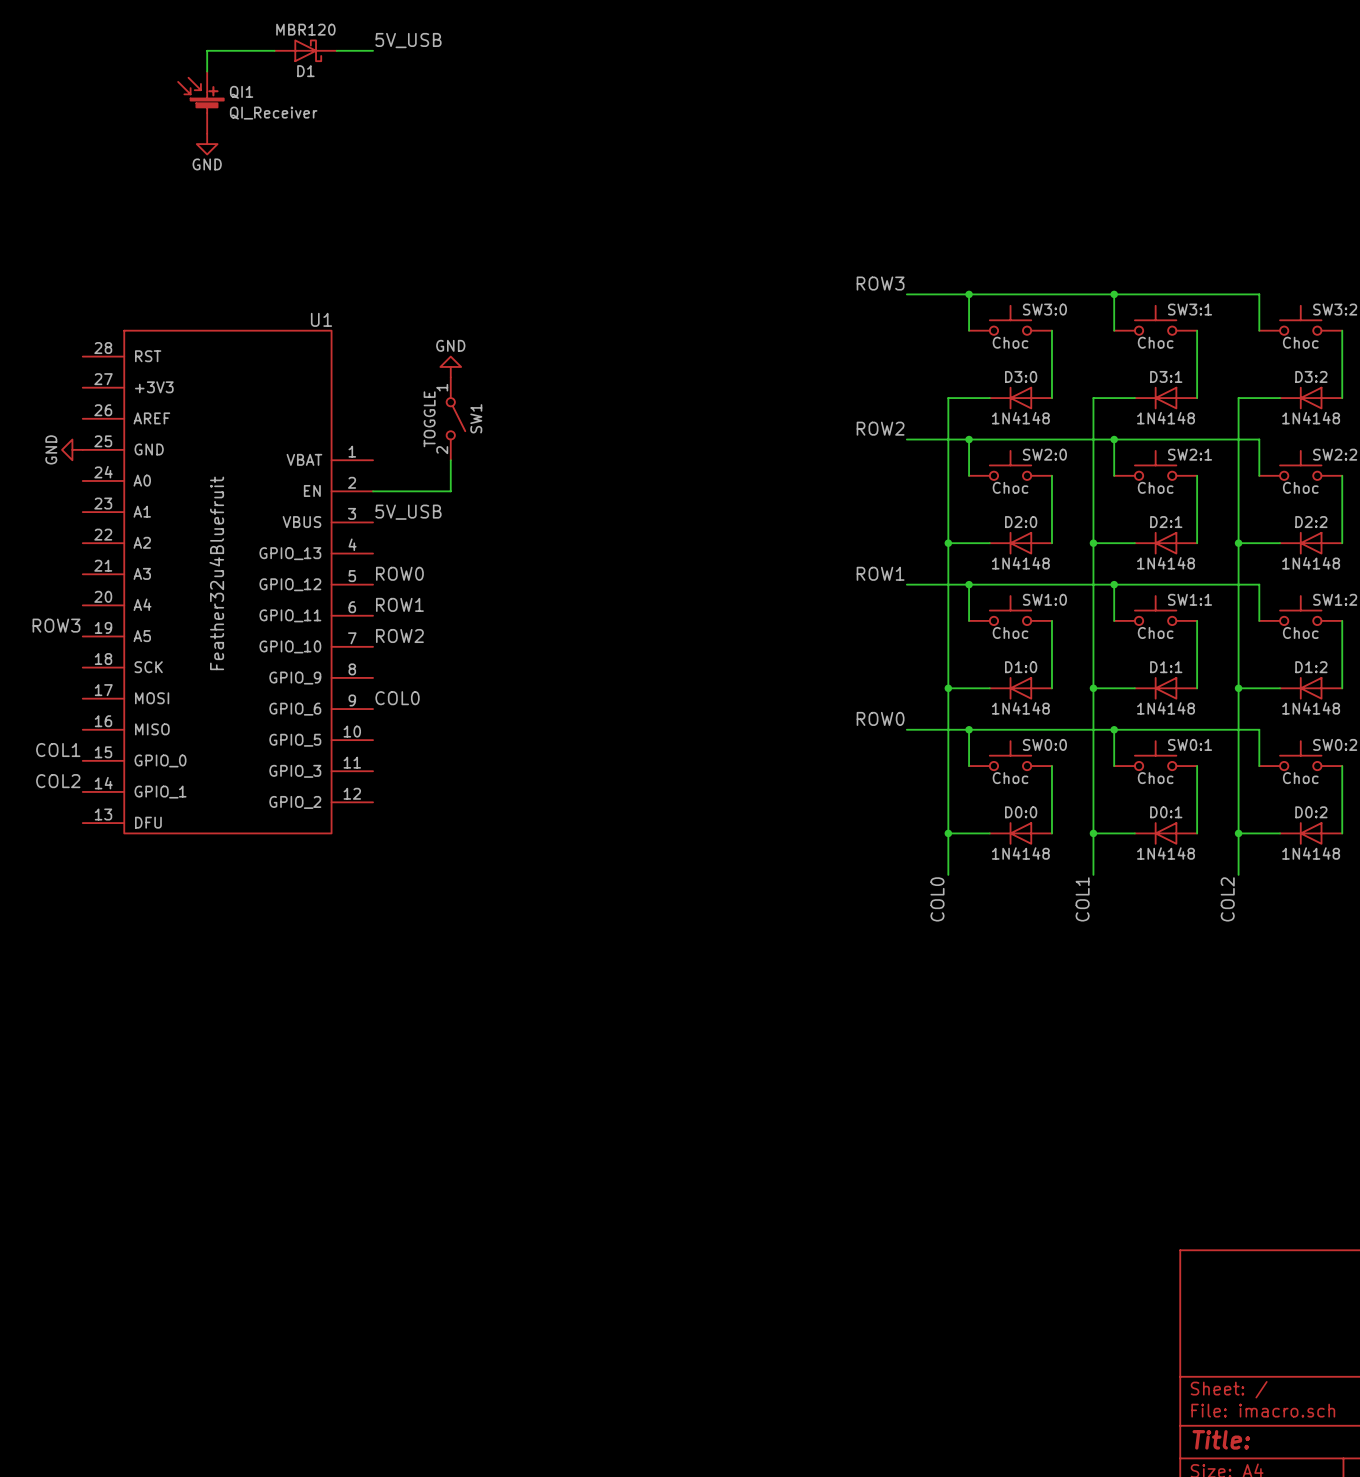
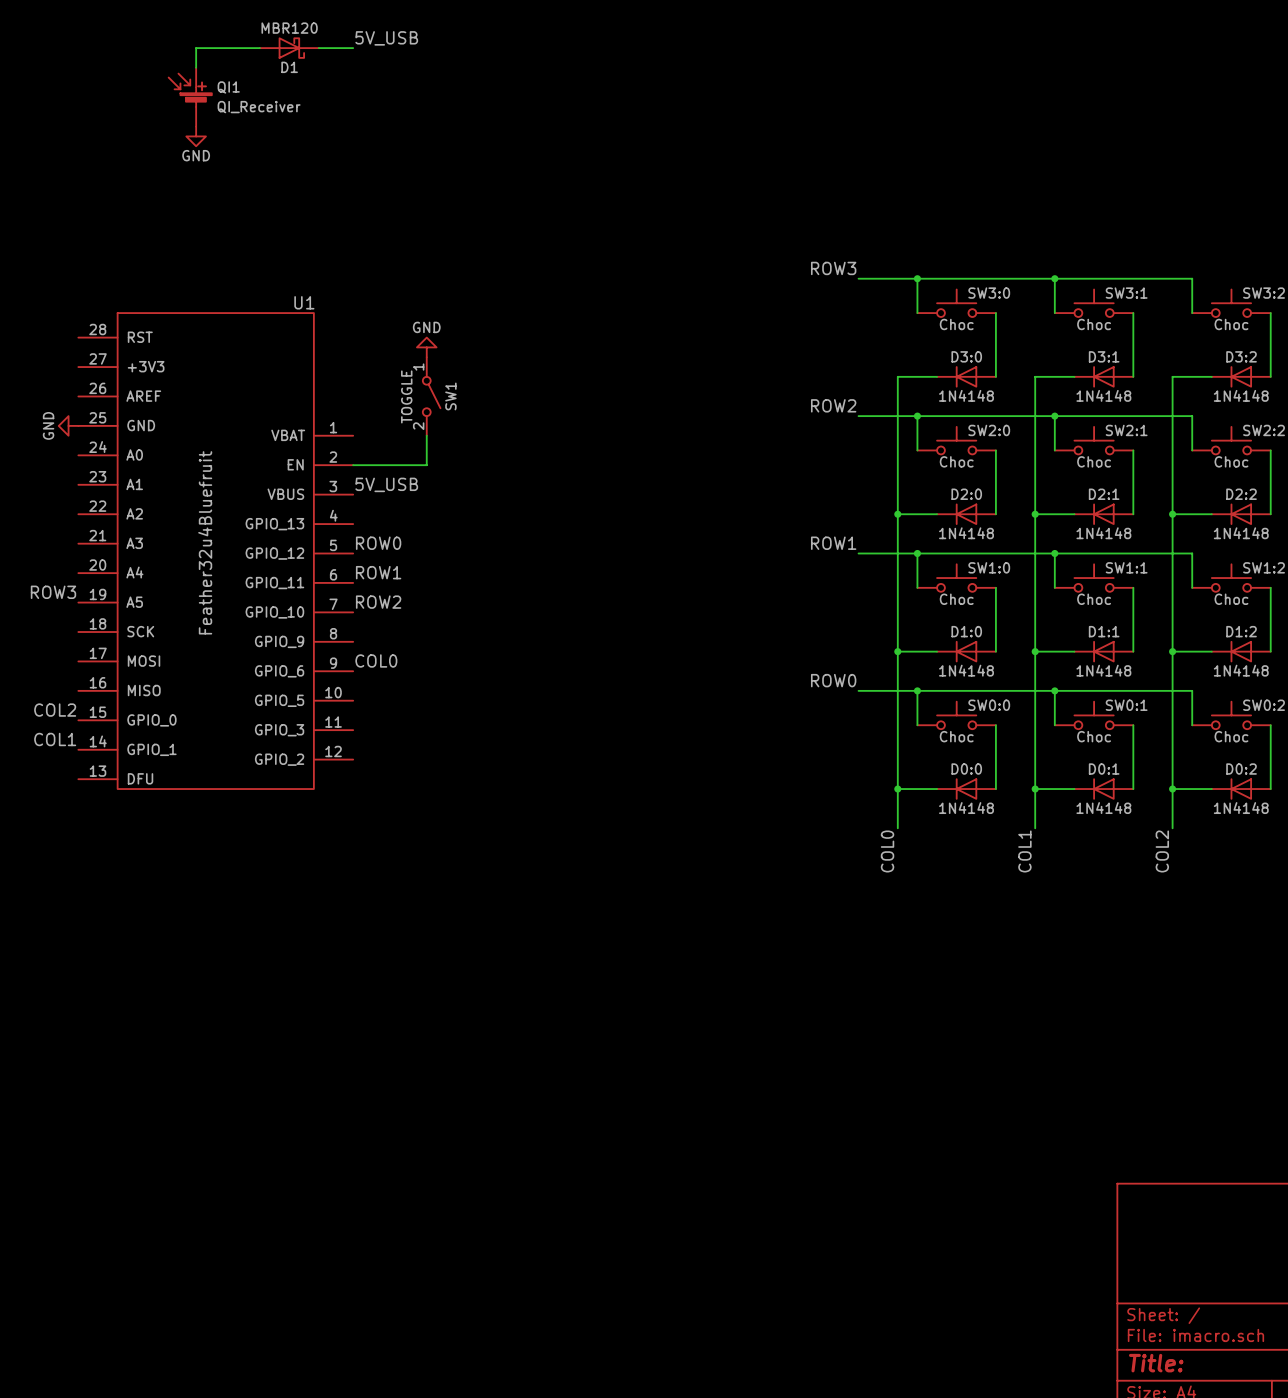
label: COL1 (58, 750) -> COL2 (55, 710)
label: COL2 (58, 781) -> COL1 (55, 739)

